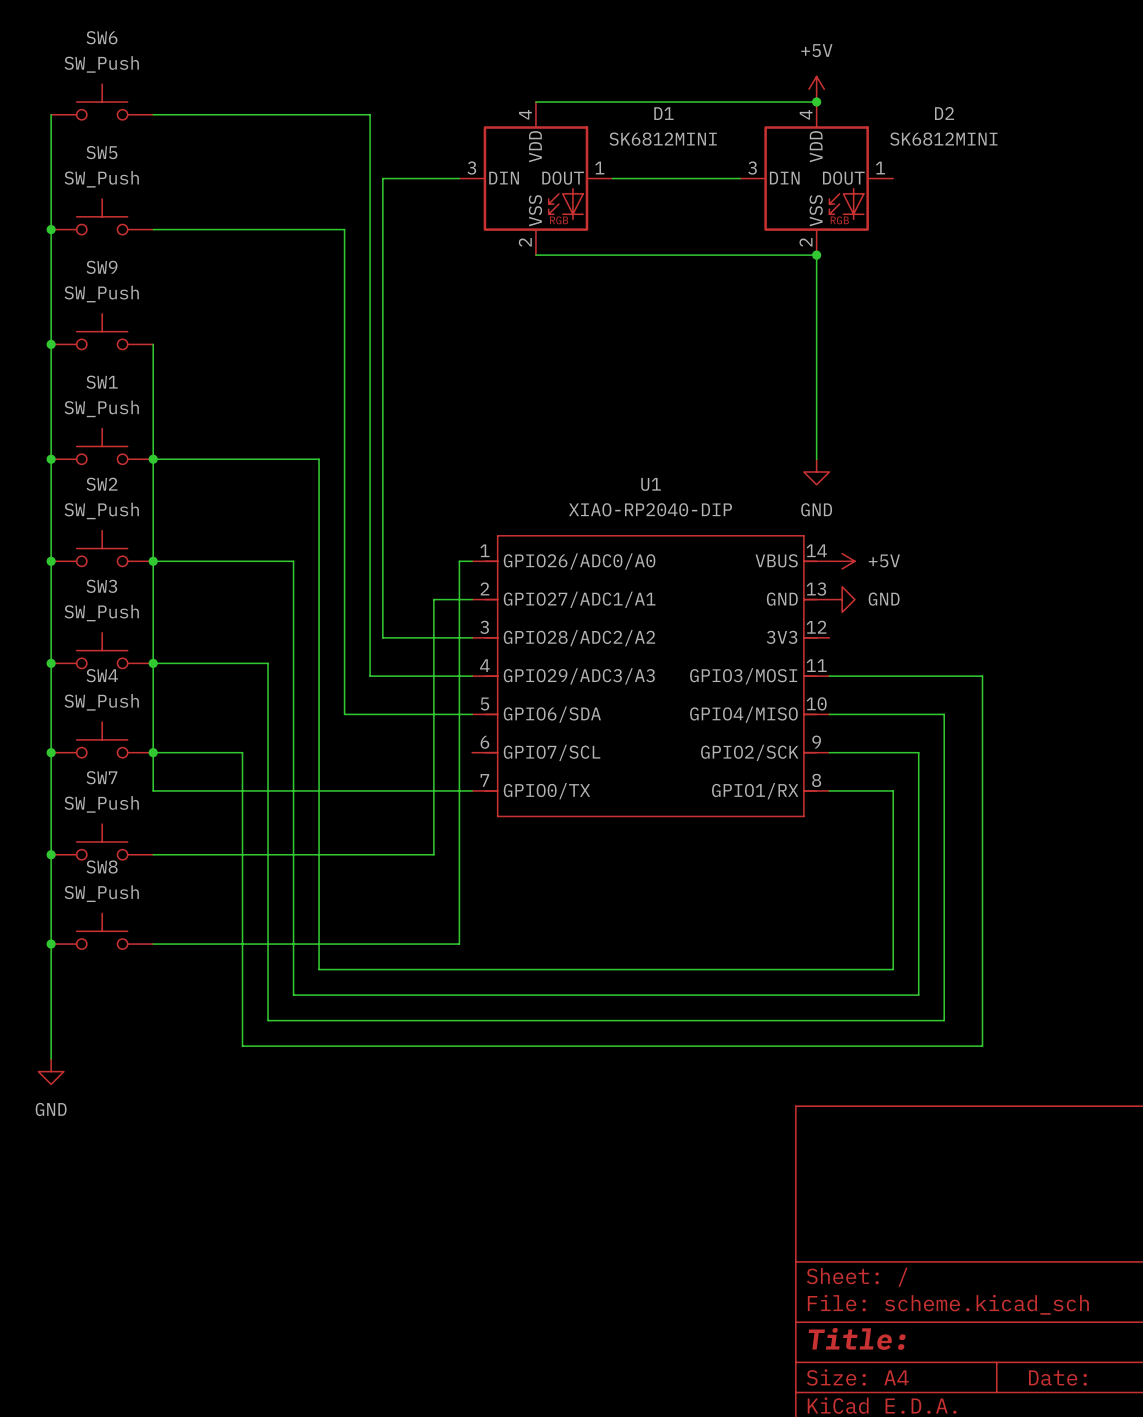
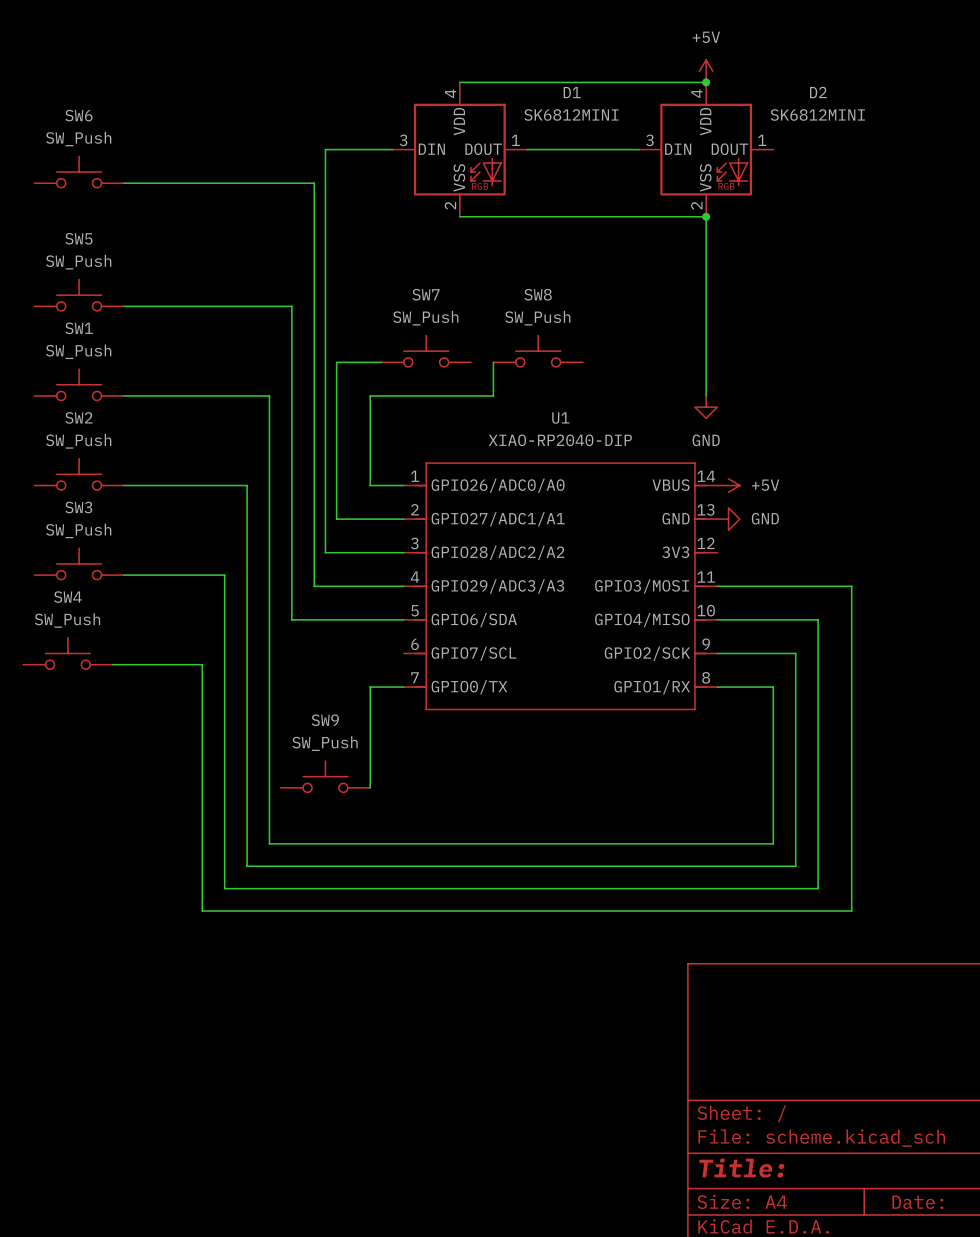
SW6 position: (102, 102) -> (79, 172)
wire: (51, 114) (51, 1058) -> none
wire: (153, 114) (370, 114) (370, 216) -> (123, 183) (314, 183)
SW5 position: (102, 216) -> (79, 295)
junction: (51, 229) -> none
wire: (153, 229) (344, 229) (344, 357) -> (123, 306) (291, 306)
SW9 position: (102, 331) -> (325, 776)
junction: (51, 344) -> none
wire: (153, 344) (153, 790) (433, 790) (433, 599) -> (381, 362) (336, 362) (336, 519) (370, 519)
junction: (51, 459) -> none
junction: (153, 459) -> none
junction: (51, 561) -> none
junction: (153, 561) -> none
wire: (459, 561) (459, 944) (153, 944) -> (392, 485) (370, 485) (370, 395) (493, 395) (493, 362)
junction: (51, 663) -> none
junction: (153, 663) -> none
SW4 position: (102, 739) -> (67, 653)
junction: (51, 752) -> none
wire: (153, 752) (242, 752) (242, 765) -> (112, 664) (202, 664)
junction: (153, 752) -> none
SW7 position: (102, 841) -> (426, 351)
junction: (51, 854) -> none
wire: (153, 854) (433, 854) -> (370, 787) (370, 743)
SW8 position: (102, 931) -> (538, 351)
junction: (51, 944) -> none
power symbol: GND (51, 1071) -> none

